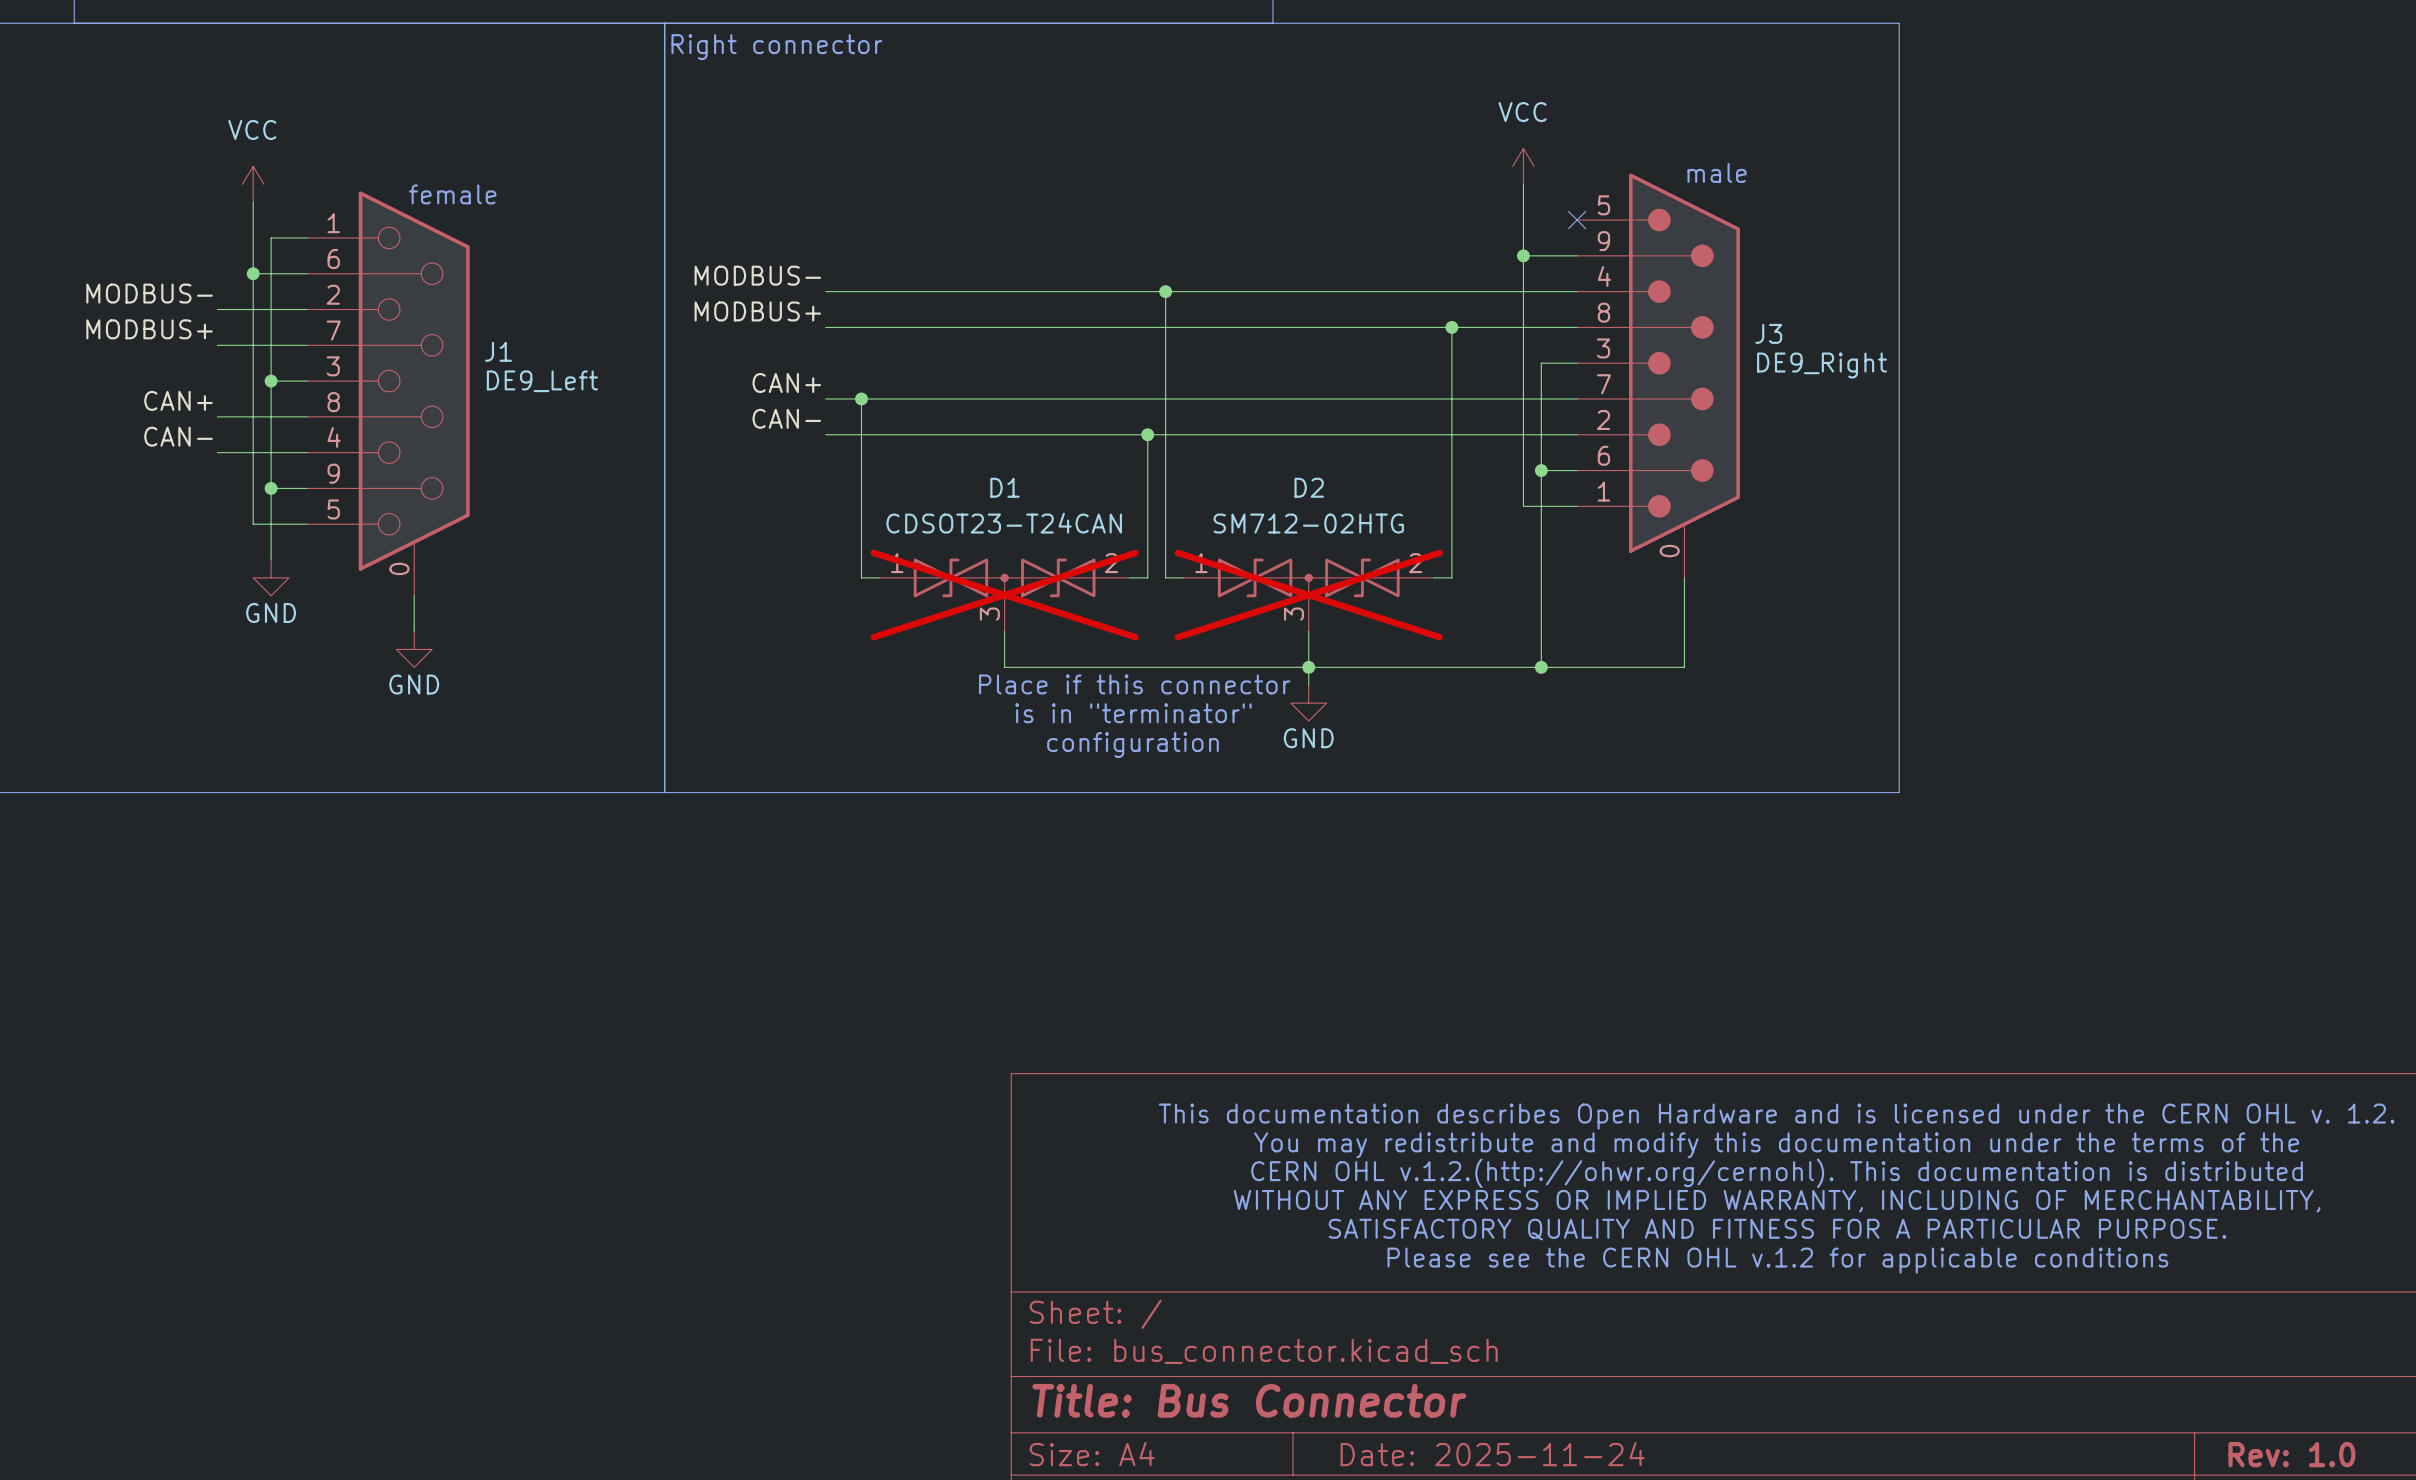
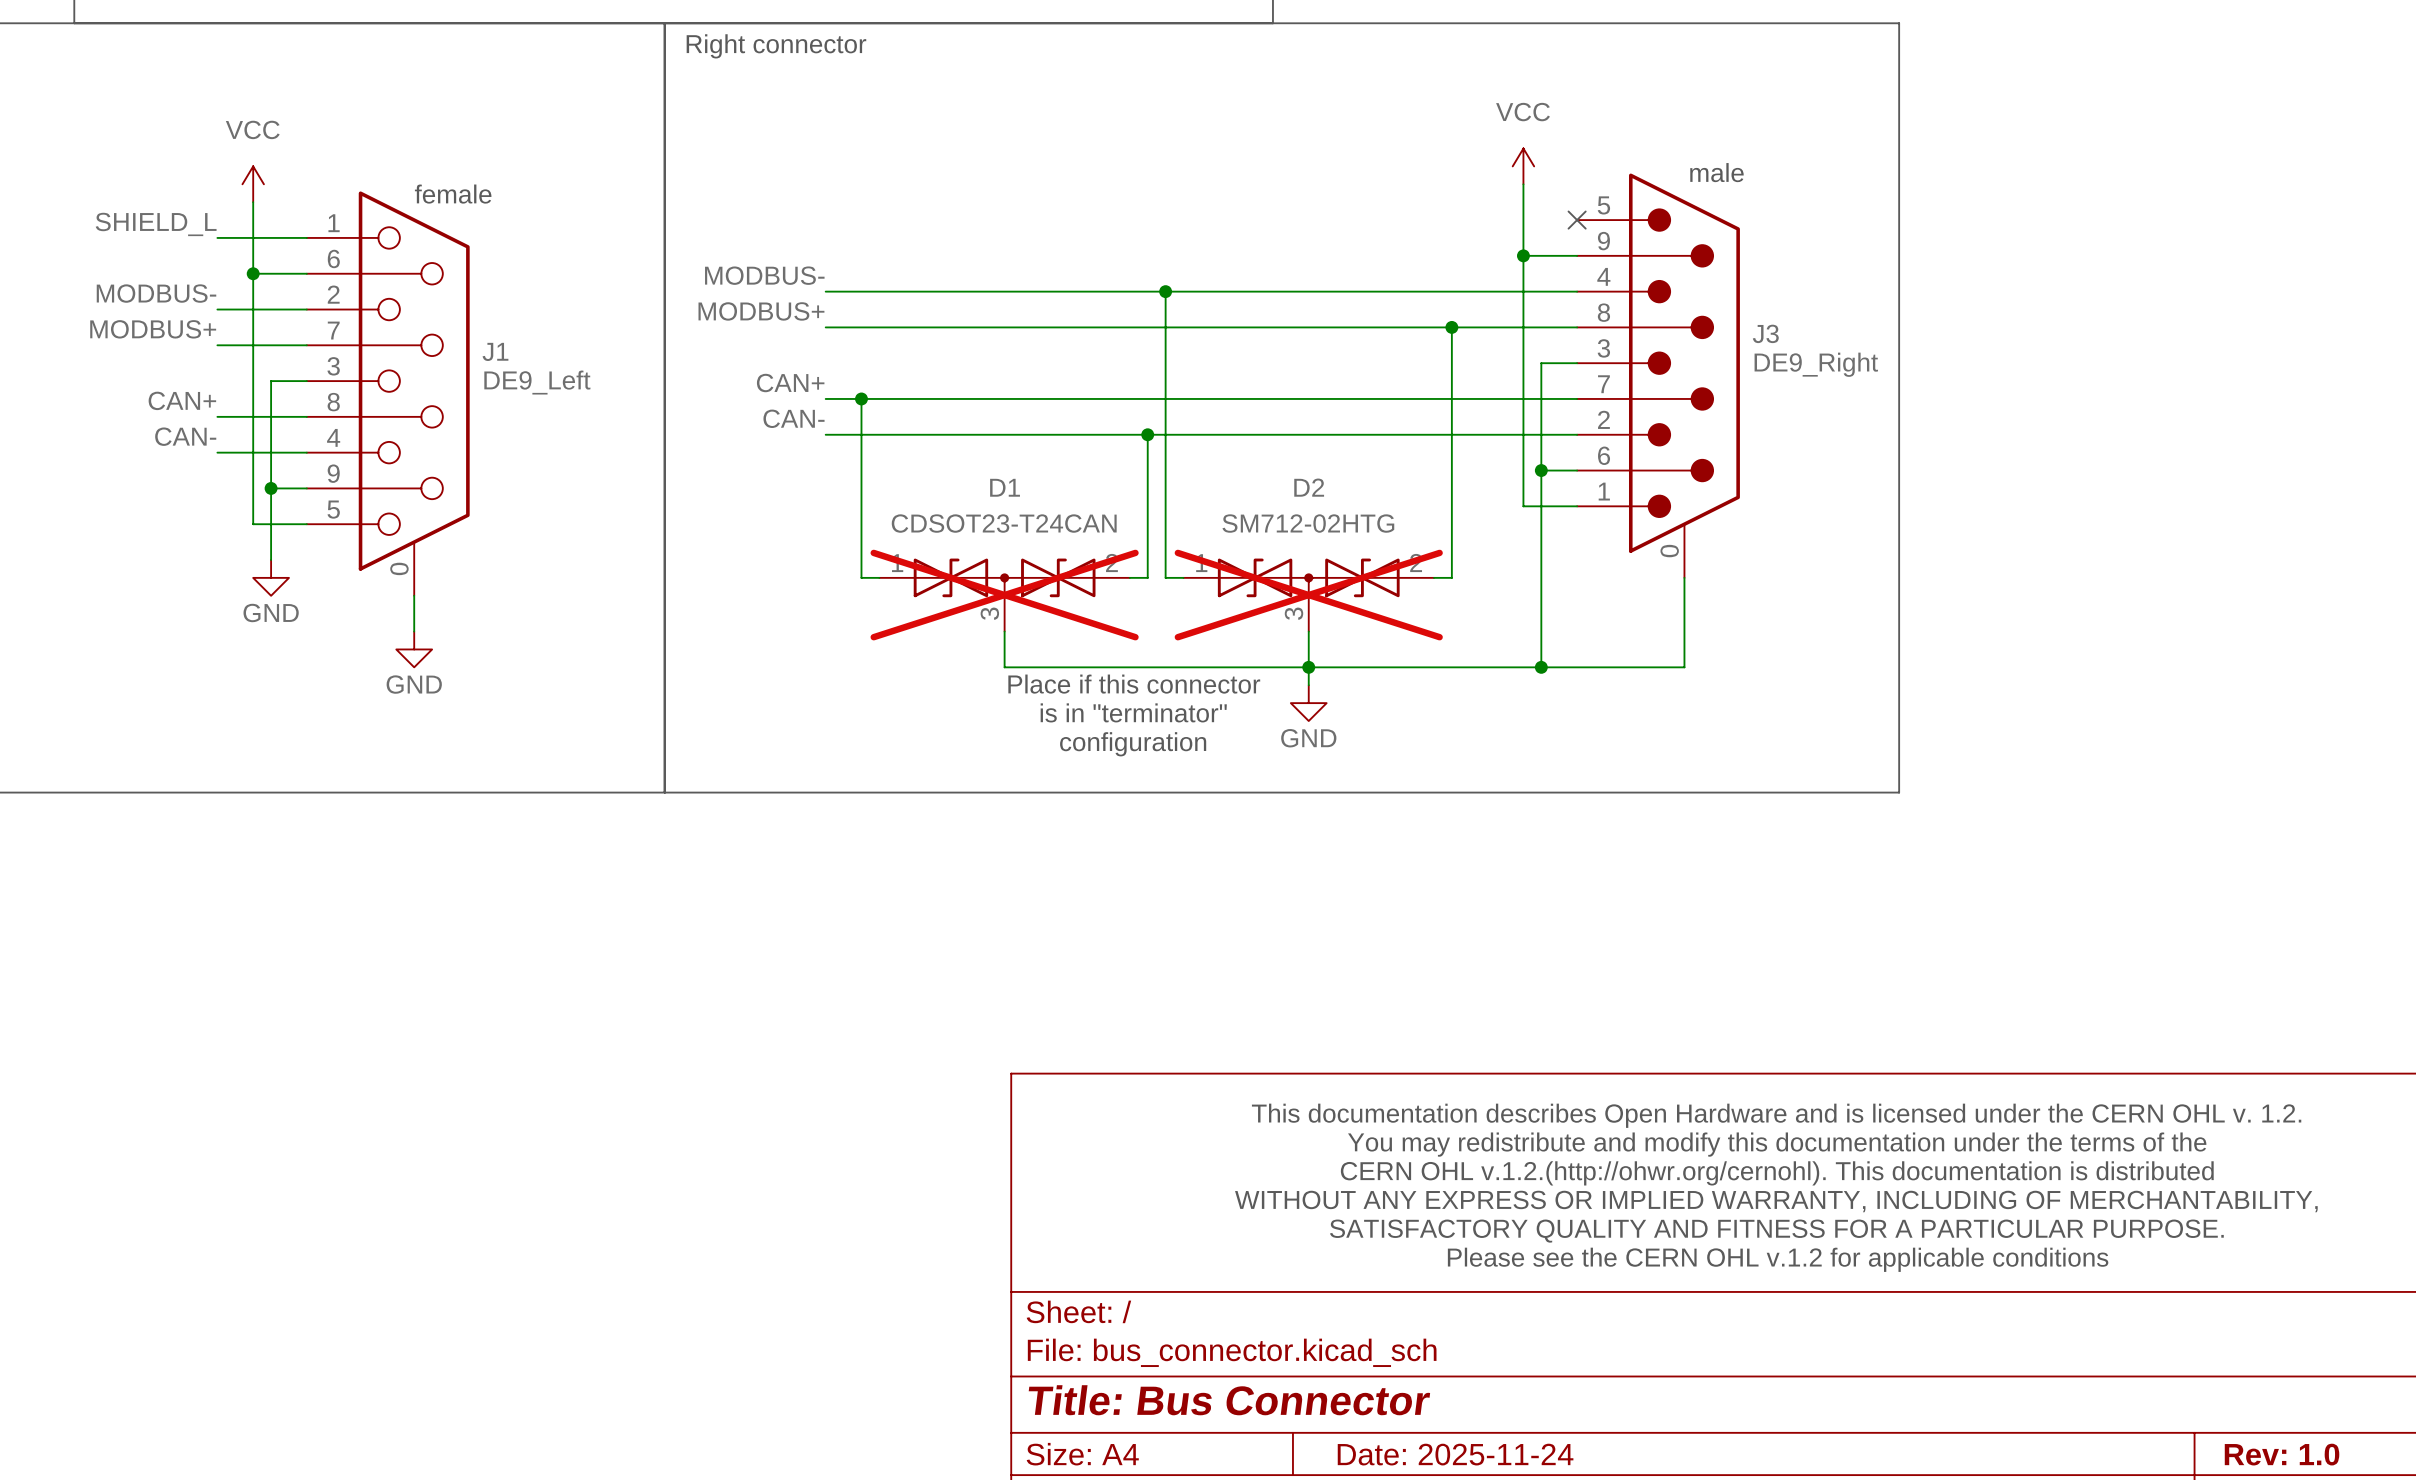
label: none -> SHIELD_L (156, 224)
wire: (271, 237) (271, 381) -> (271, 237) (217, 237)
junction: (271, 381) -> none

